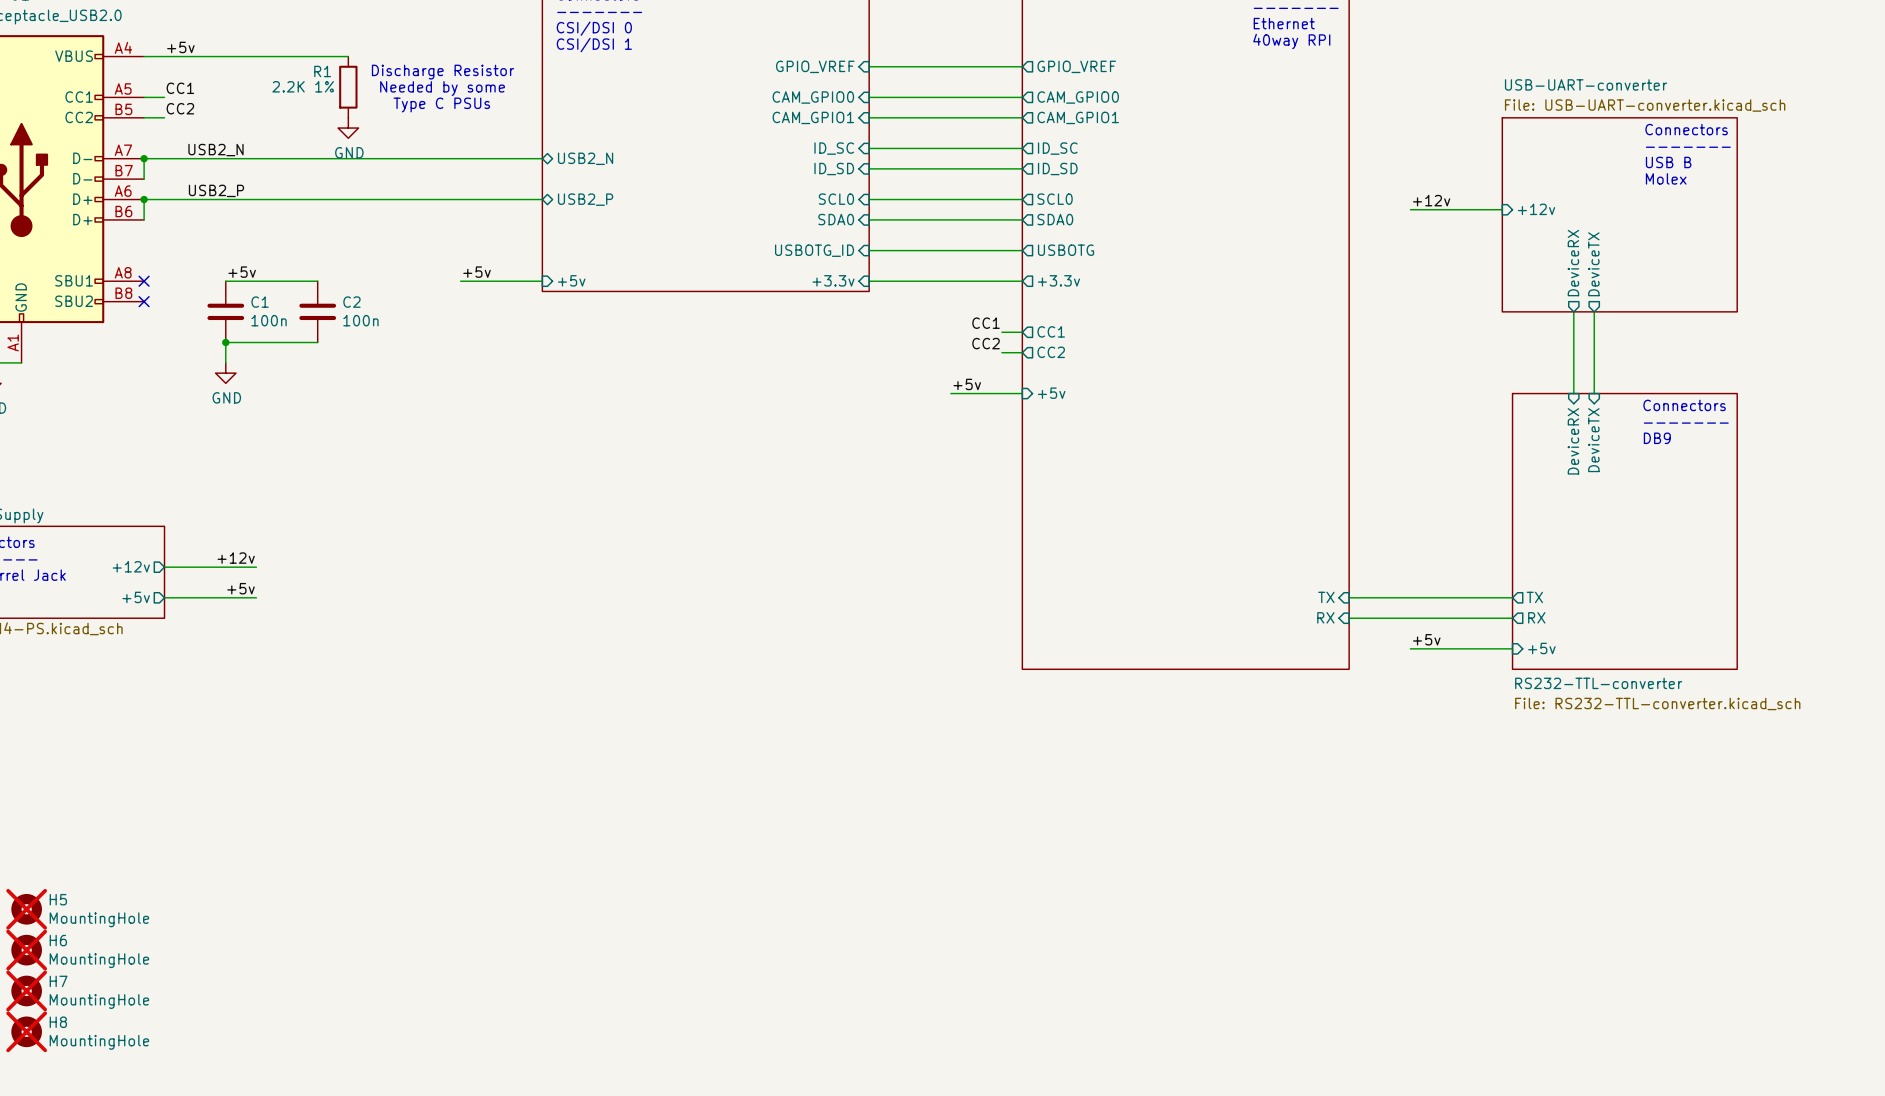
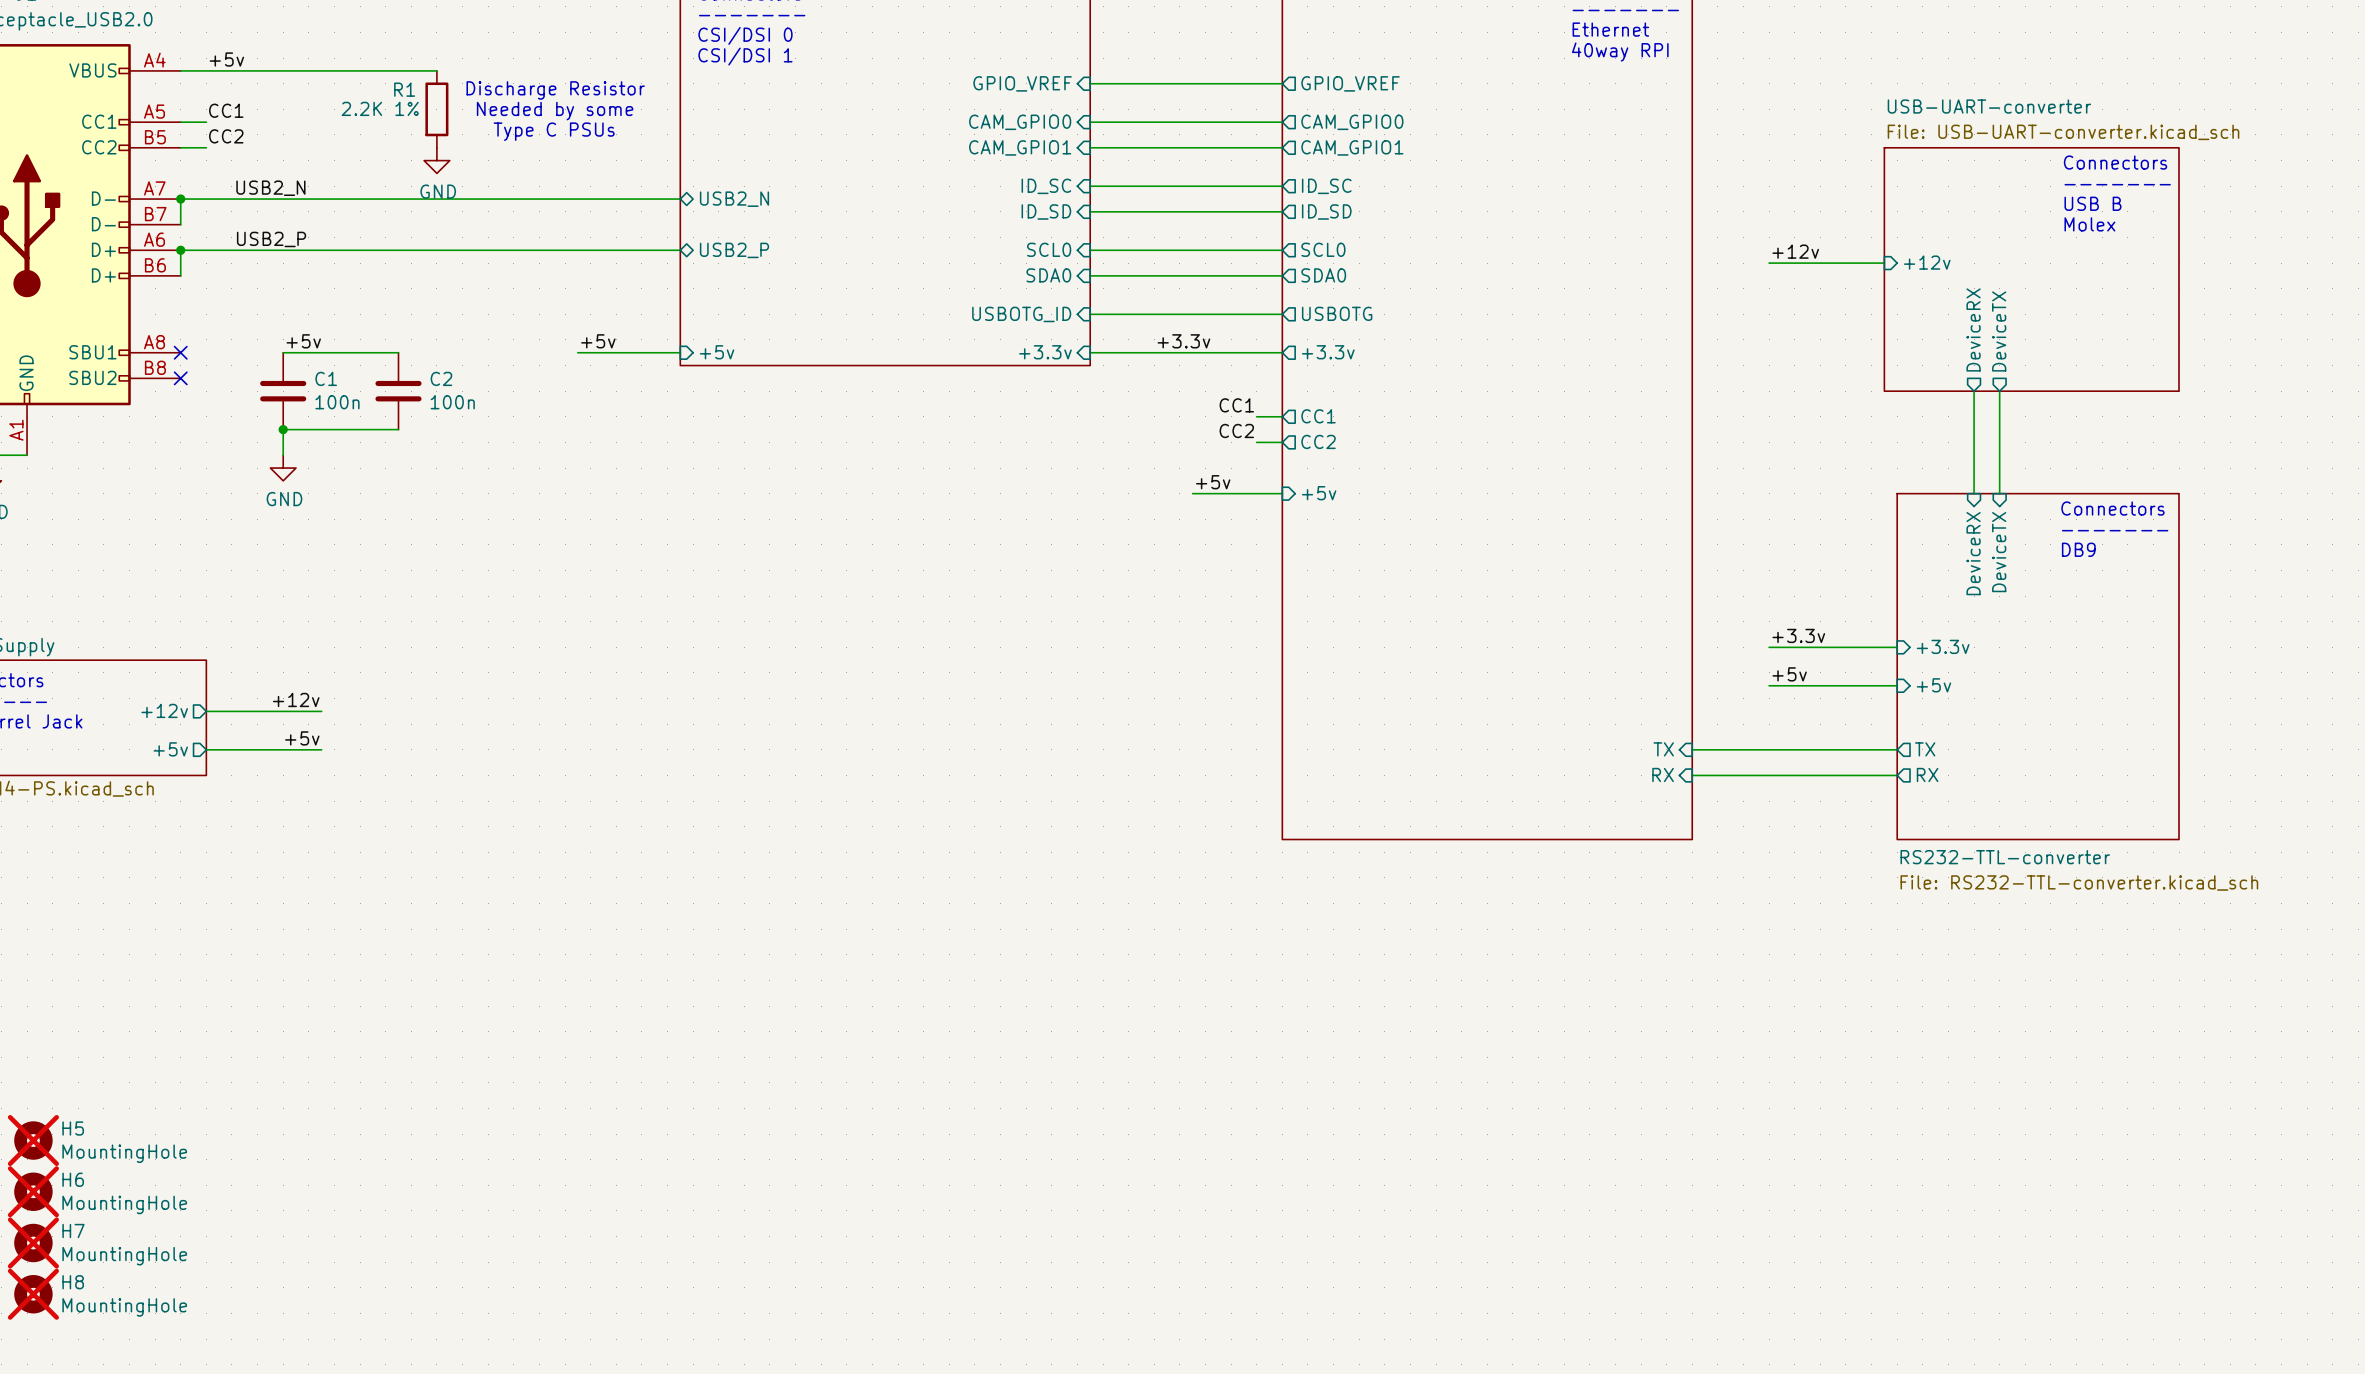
label: none -> +3.3v (1183, 341)
label: none -> +3.3v (1798, 635)
sheet pin: none -> +3.3v (1943, 646)
wire: none -> (1769, 647) (1897, 647)
label position: +5v (1426, 639) -> +5v (1789, 674)
wire: (1410, 648) (1512, 648) -> (1769, 685) (1897, 685)
sheet pin position: +5v (1541, 648) -> +5v (1933, 685)

